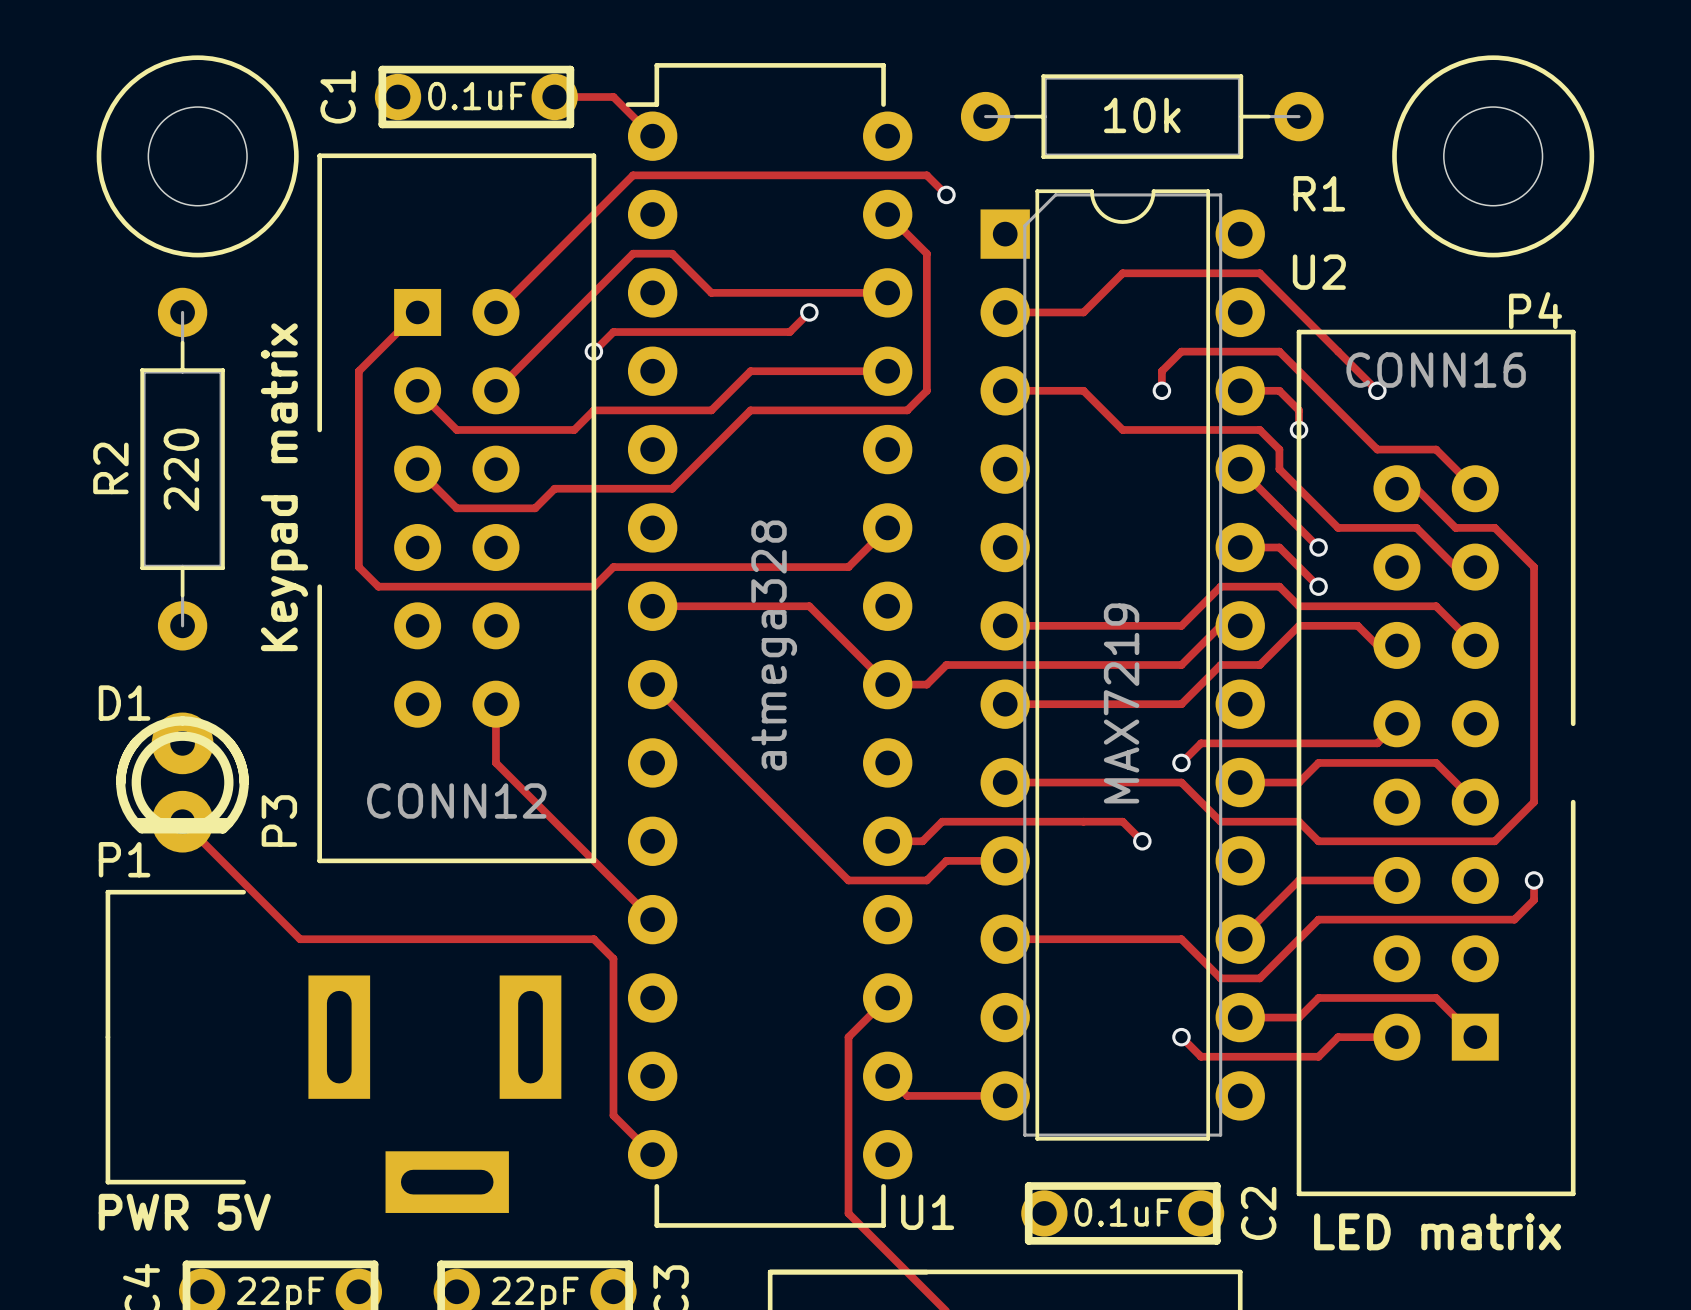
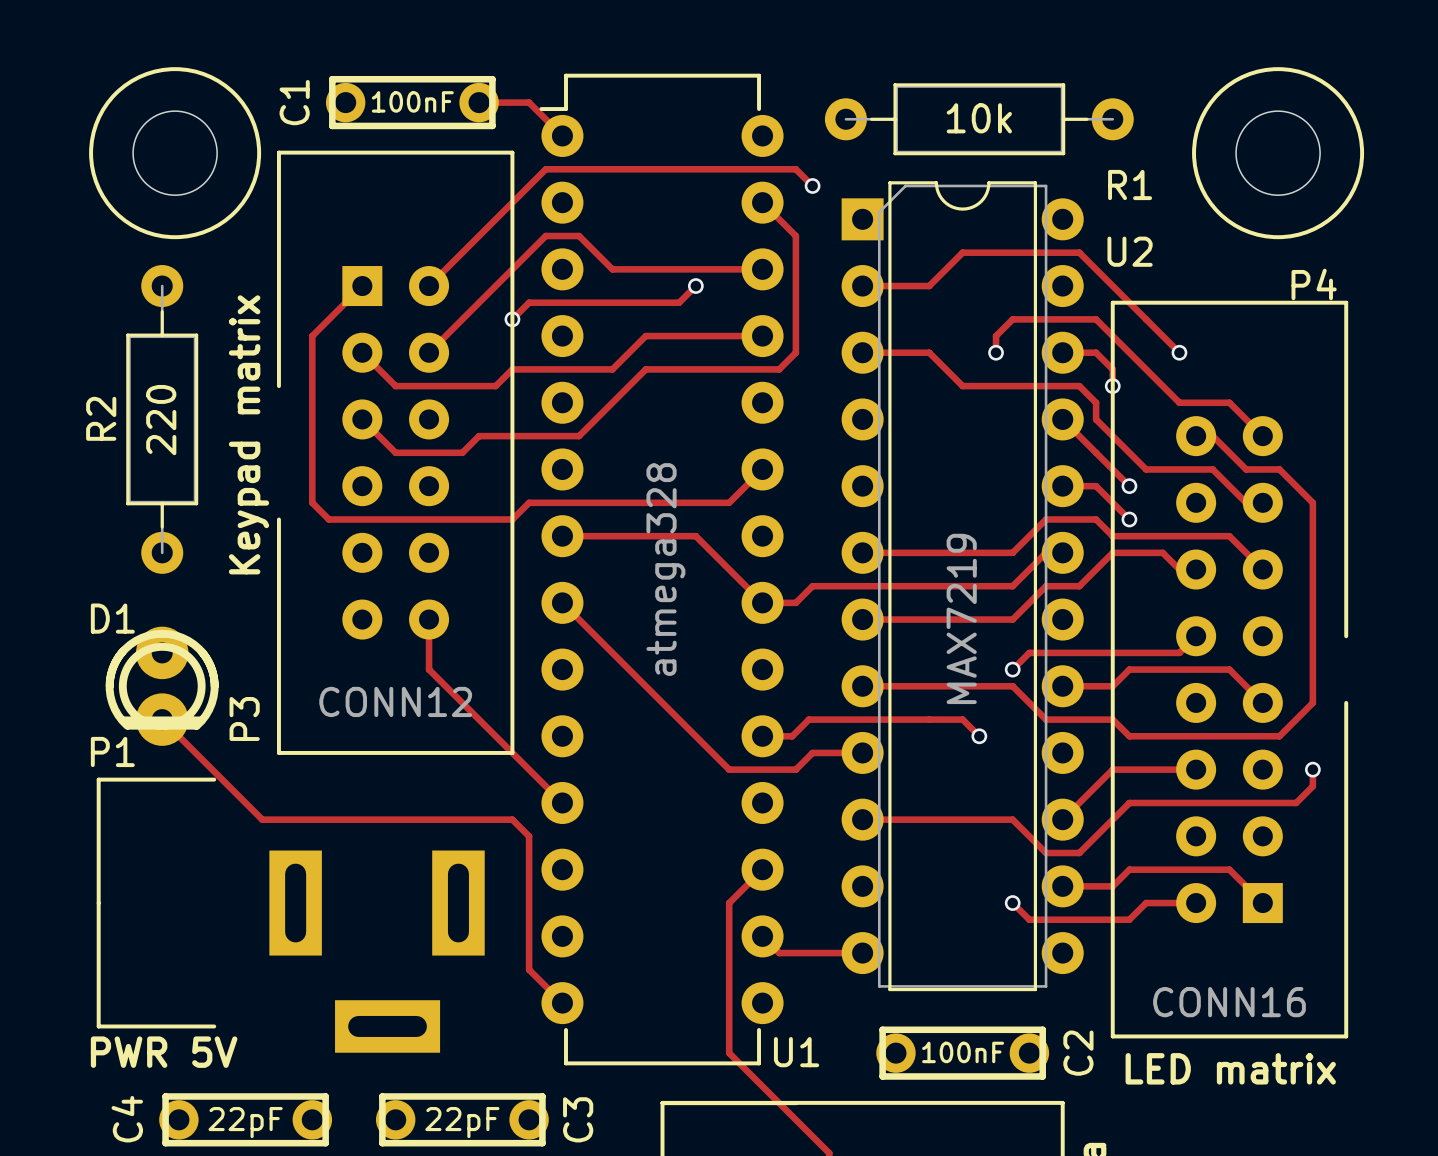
C1 value: 0.1uF (476, 96) -> 100nF (412, 101)
P4 value position: CONN16 (1436, 370) -> CONN16 (1229, 1002)
C2 value: 0.1uF (1123, 1212) -> 100nF (963, 1052)

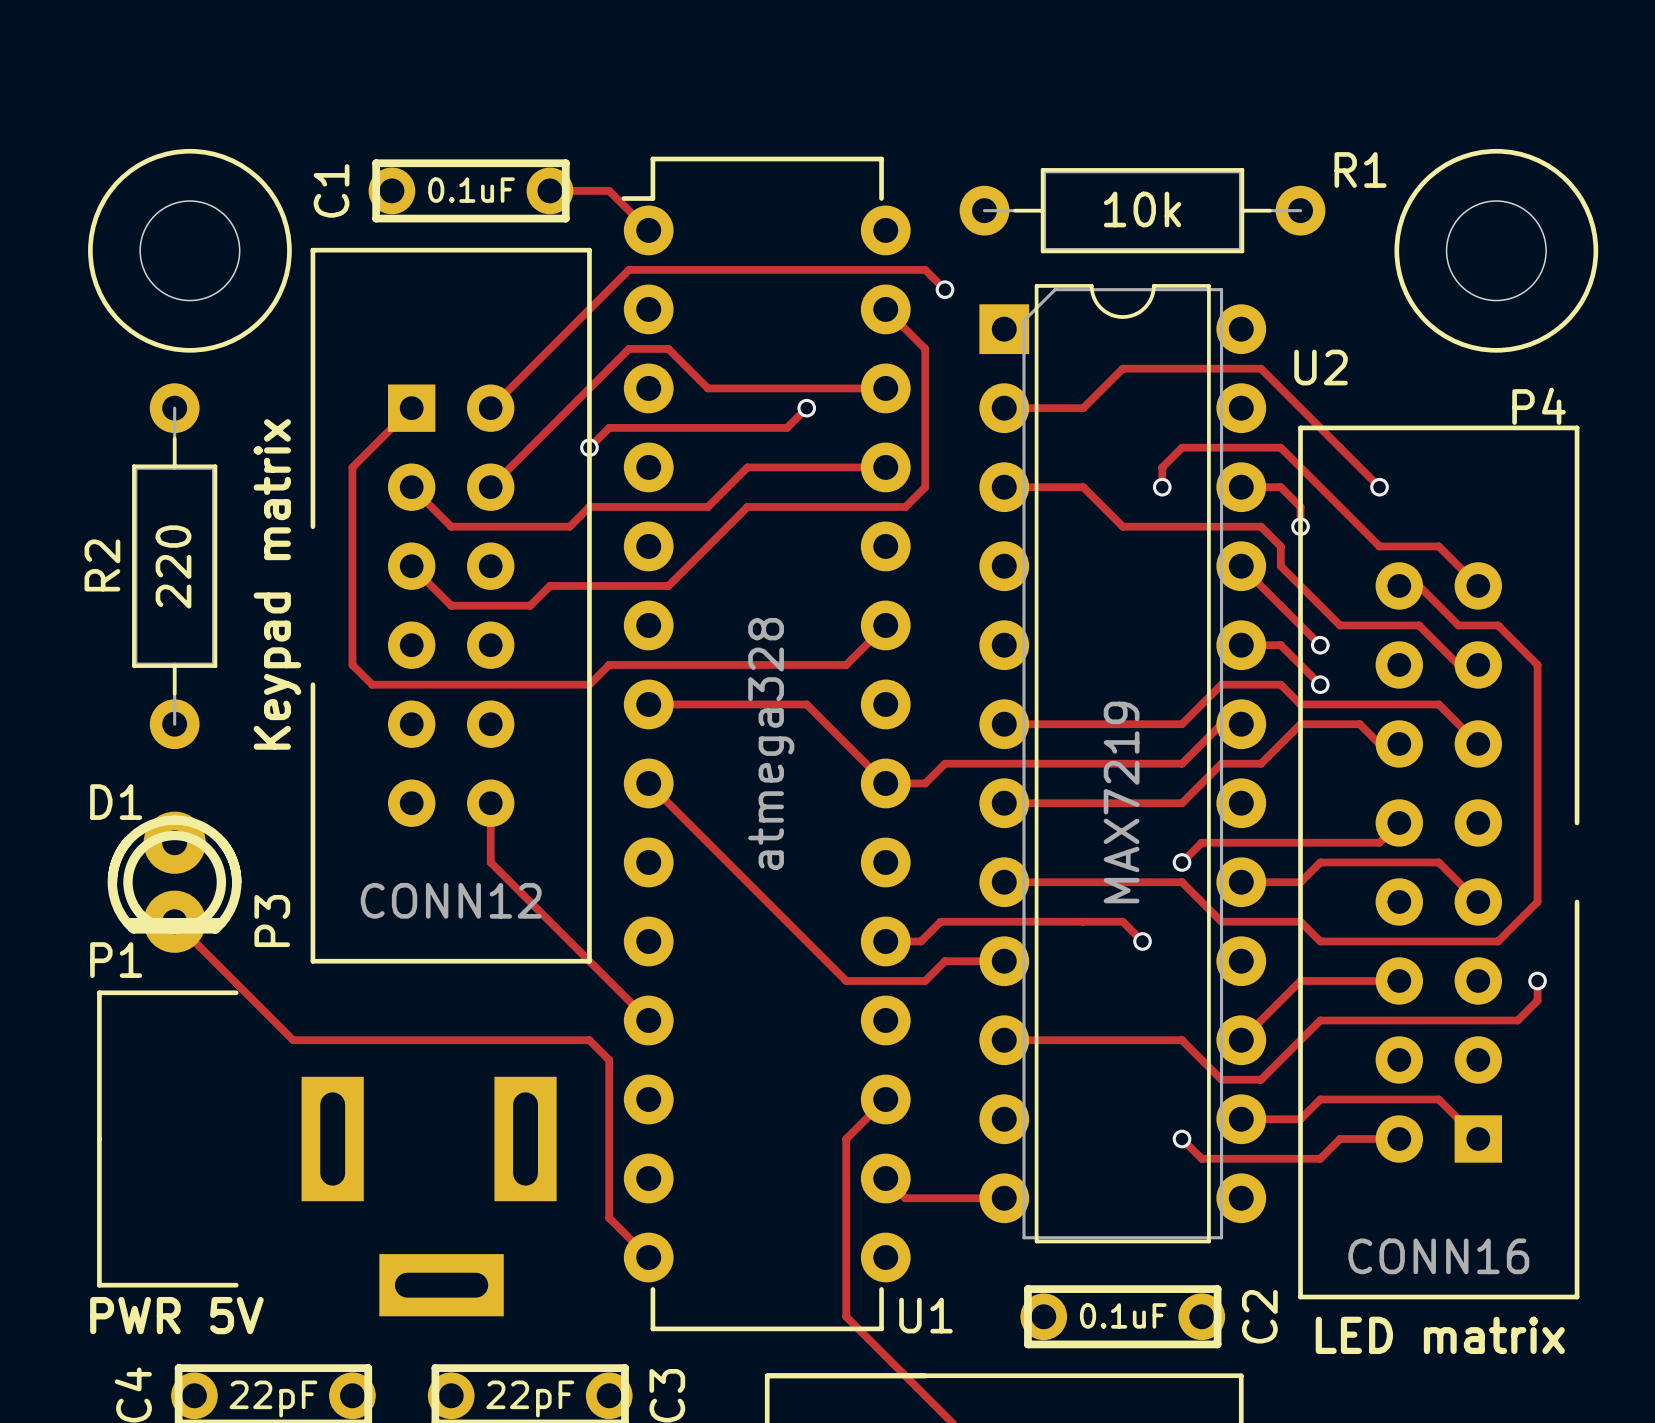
C1 value: 100nF (412, 101) -> 0.1uF (471, 190)
R1 name position: R1 (1130, 185) -> R1 (1360, 169)
C2 value: 100nF (963, 1052) -> 0.1uF (1123, 1315)

